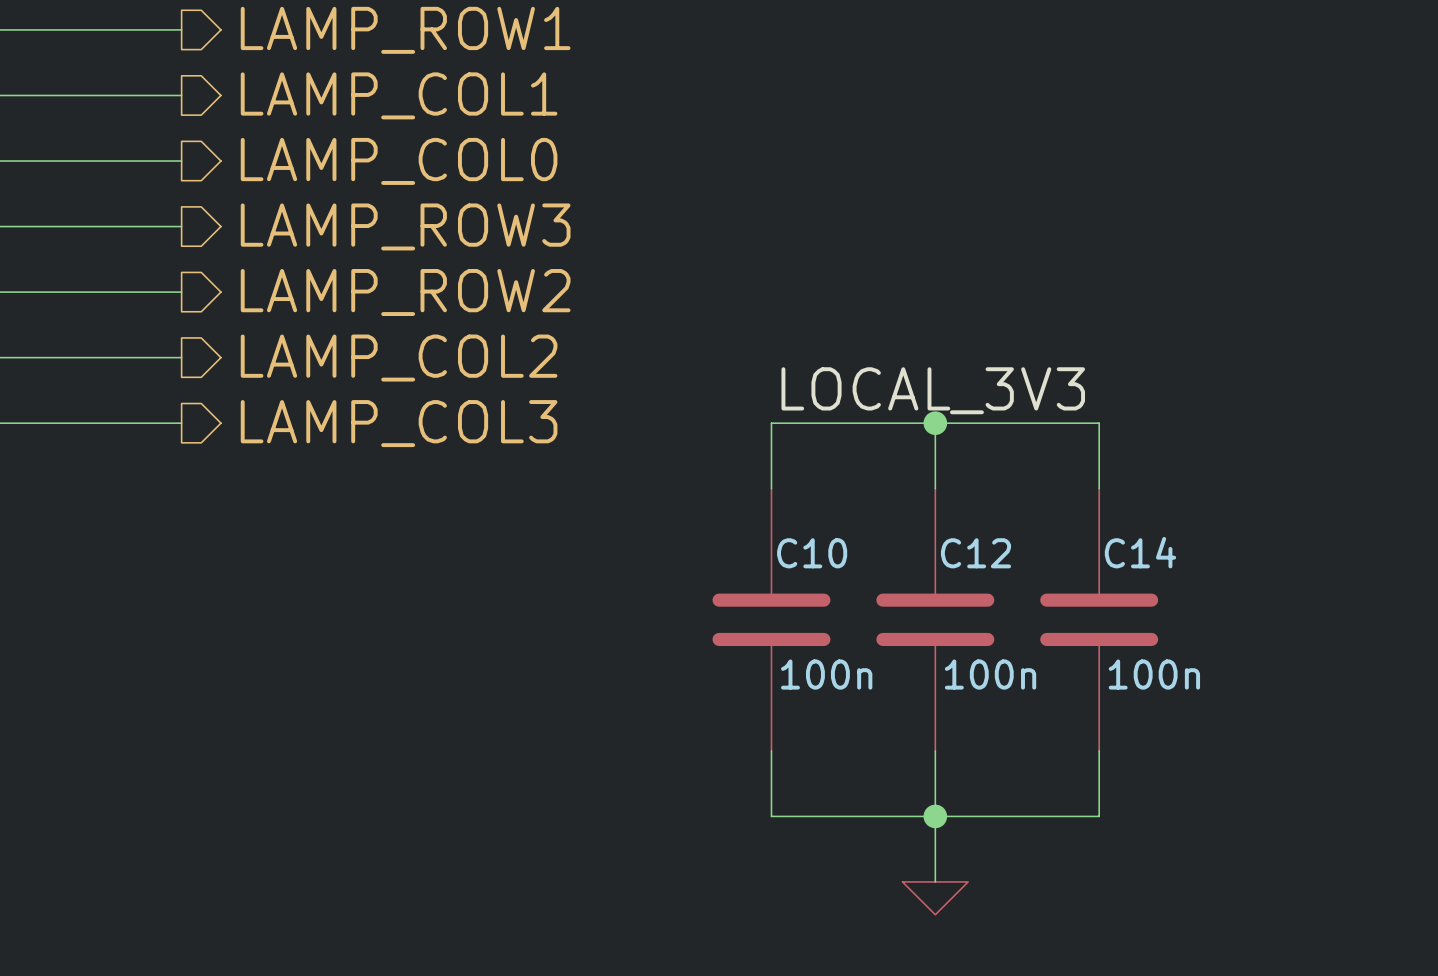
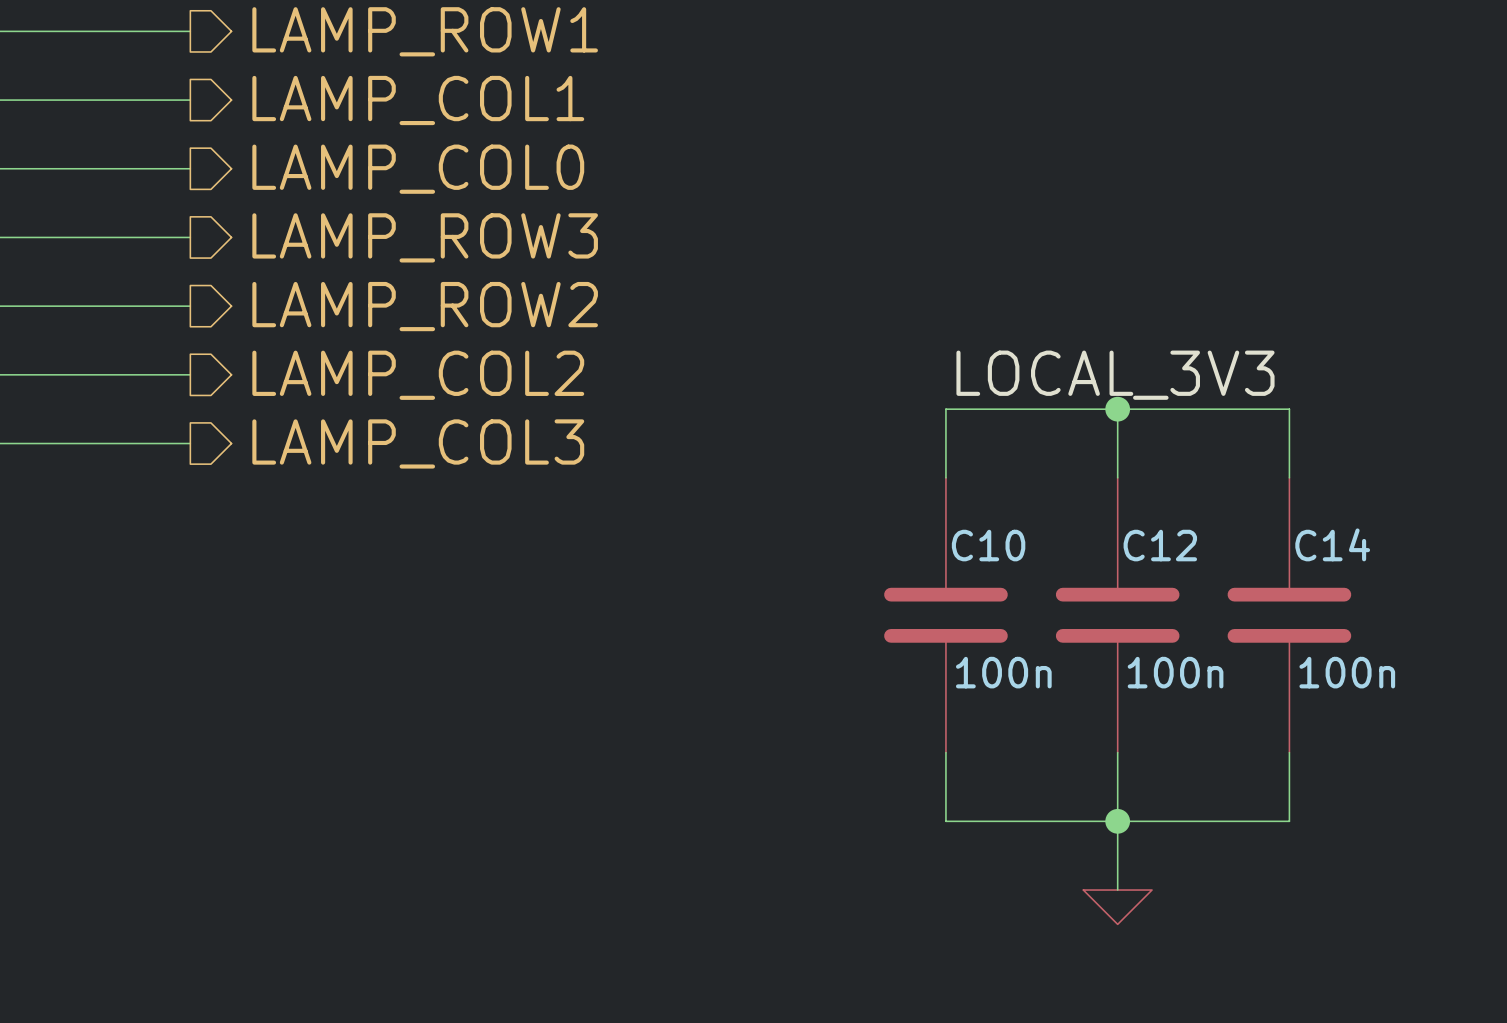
label position: LOCAL_3V3 (933, 390) -> LOCAL_3V3 (1115, 375)
wire: (935, 423) (935, 488) -> (1117, 409) (1117, 477)
junction position: (935, 423) -> (1117, 409)
wire: (771, 488) (771, 423) (1099, 423) (1099, 488) -> (945, 477) (945, 409) (1289, 409) (1289, 477)
C10 position: (771, 619) -> (945, 615)
C12 position: (935, 619) -> (1117, 615)
C14 position: (1099, 619) -> (1289, 615)
wire: (771, 750) (771, 816) (1099, 816) (1099, 750) -> (945, 752) (945, 821) (1289, 821) (1289, 752)
wire: (935, 750) (935, 881) -> (1117, 752) (1117, 890)
junction position: (935, 816) -> (1117, 821)
power symbol position: (935, 898) -> (1117, 907)

